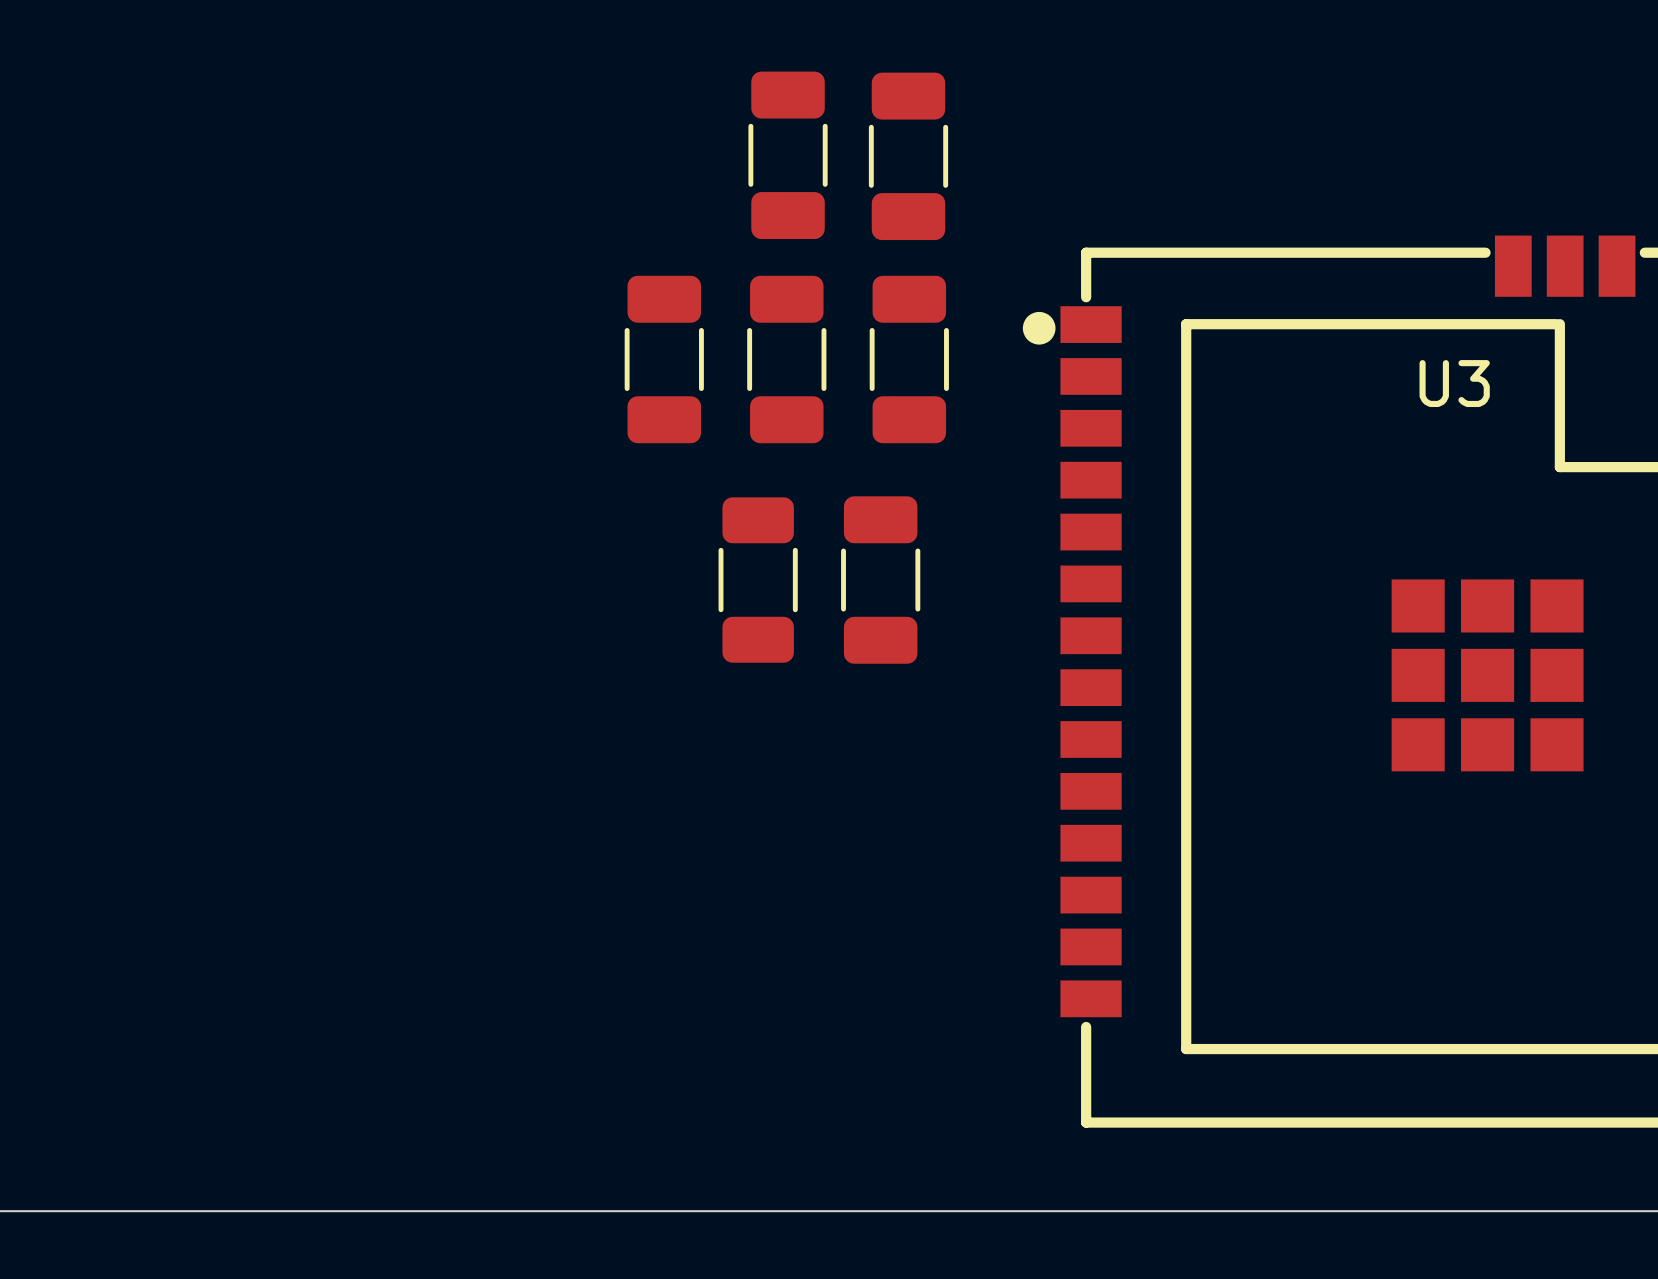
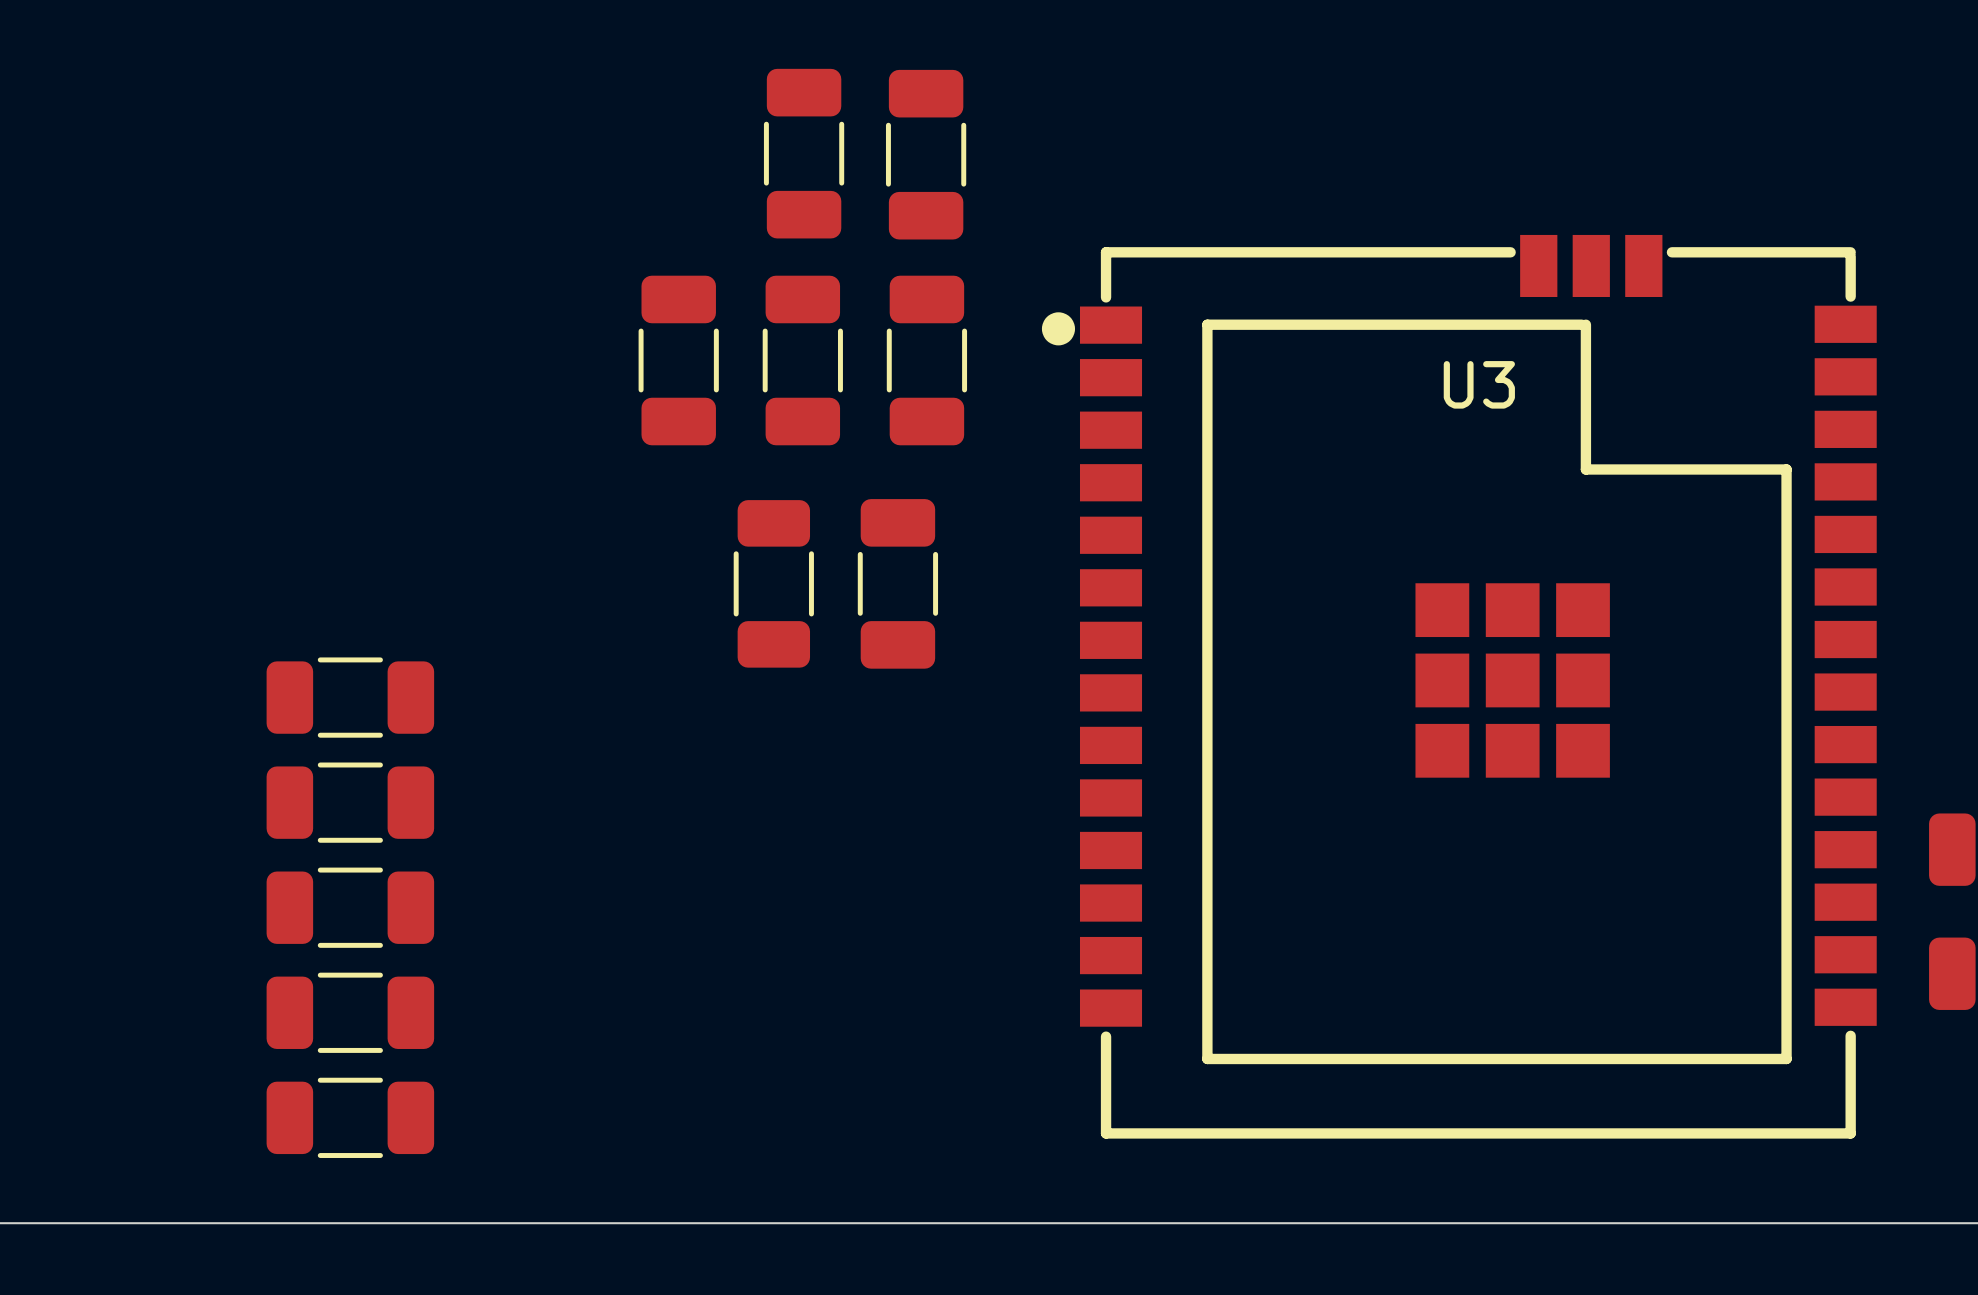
part: none -> (350, 697)
part: none -> (350, 802)
part: none -> (350, 907)
part: none -> (350, 1012)
part: none -> (350, 1117)

